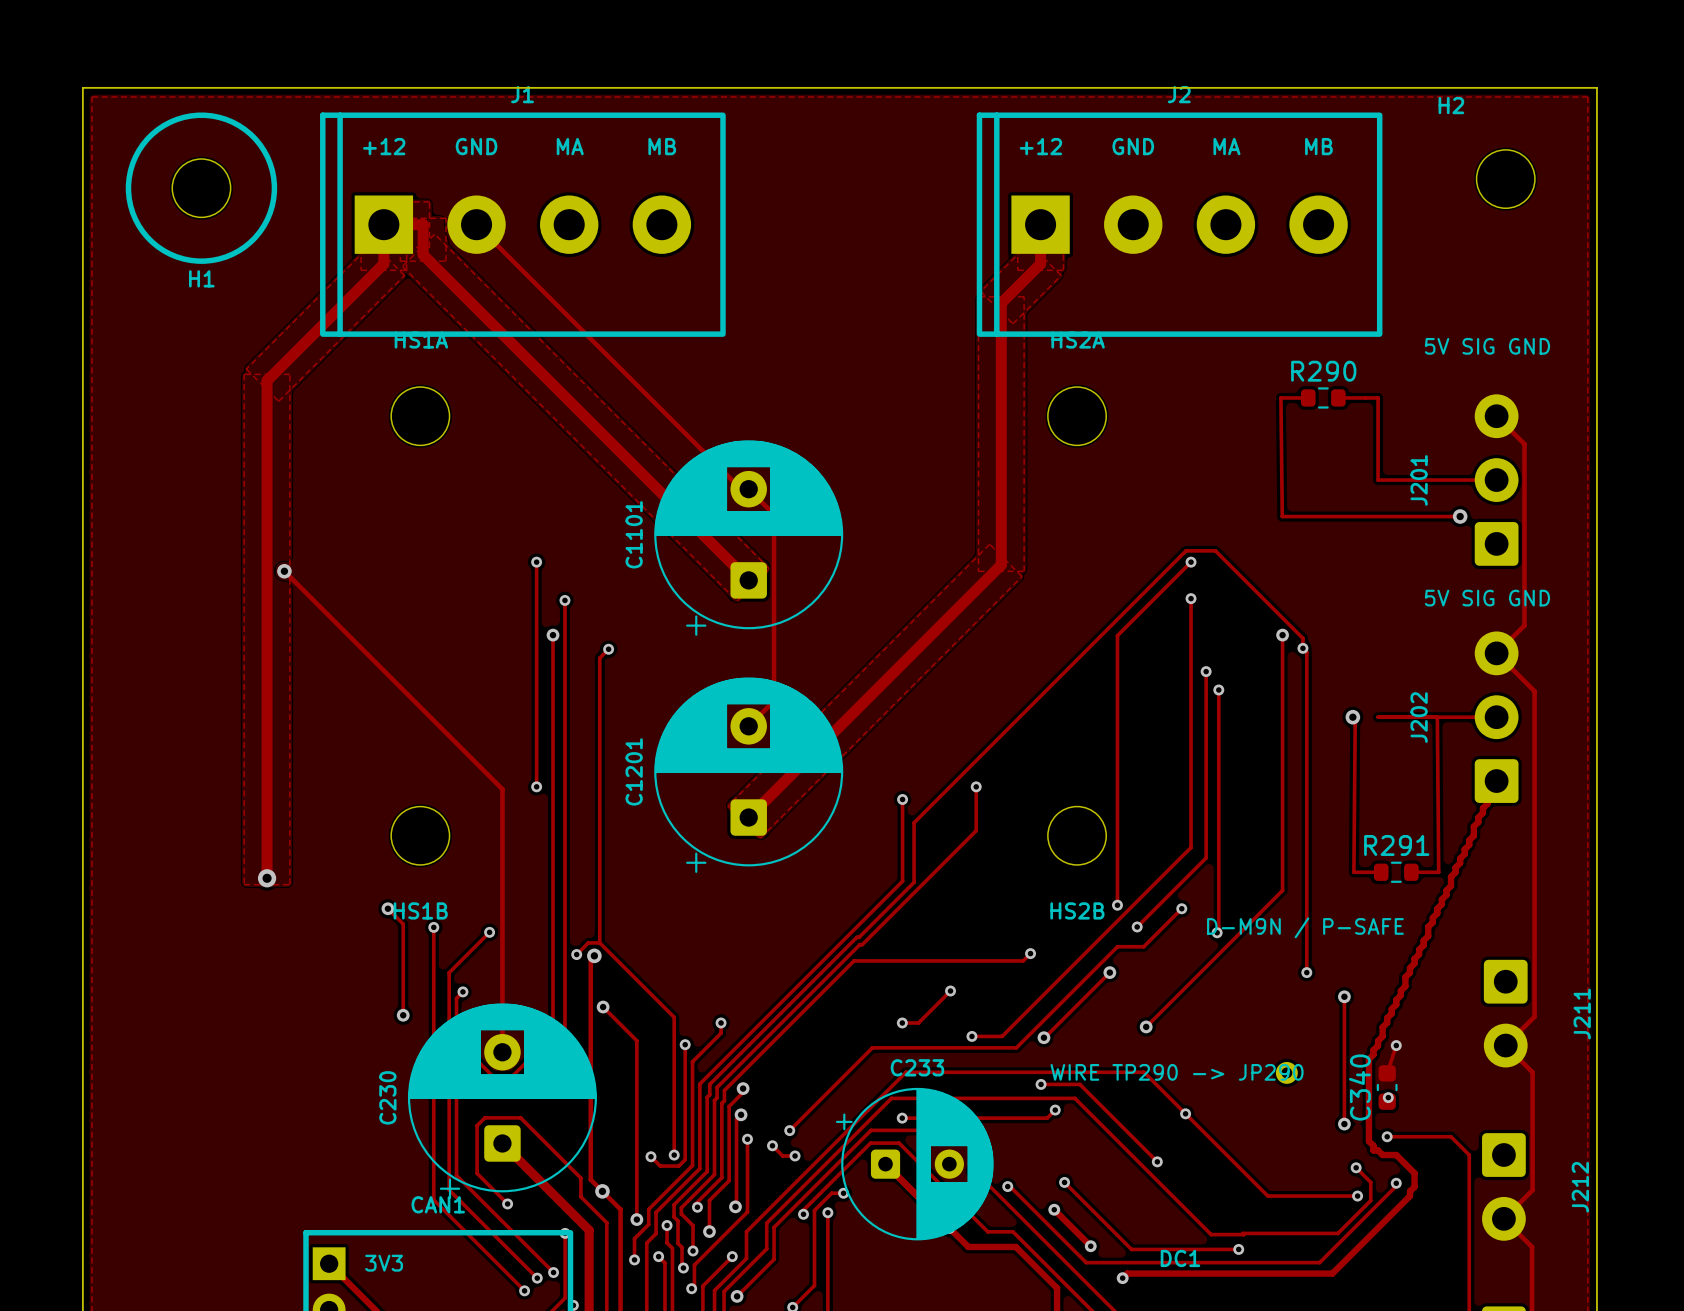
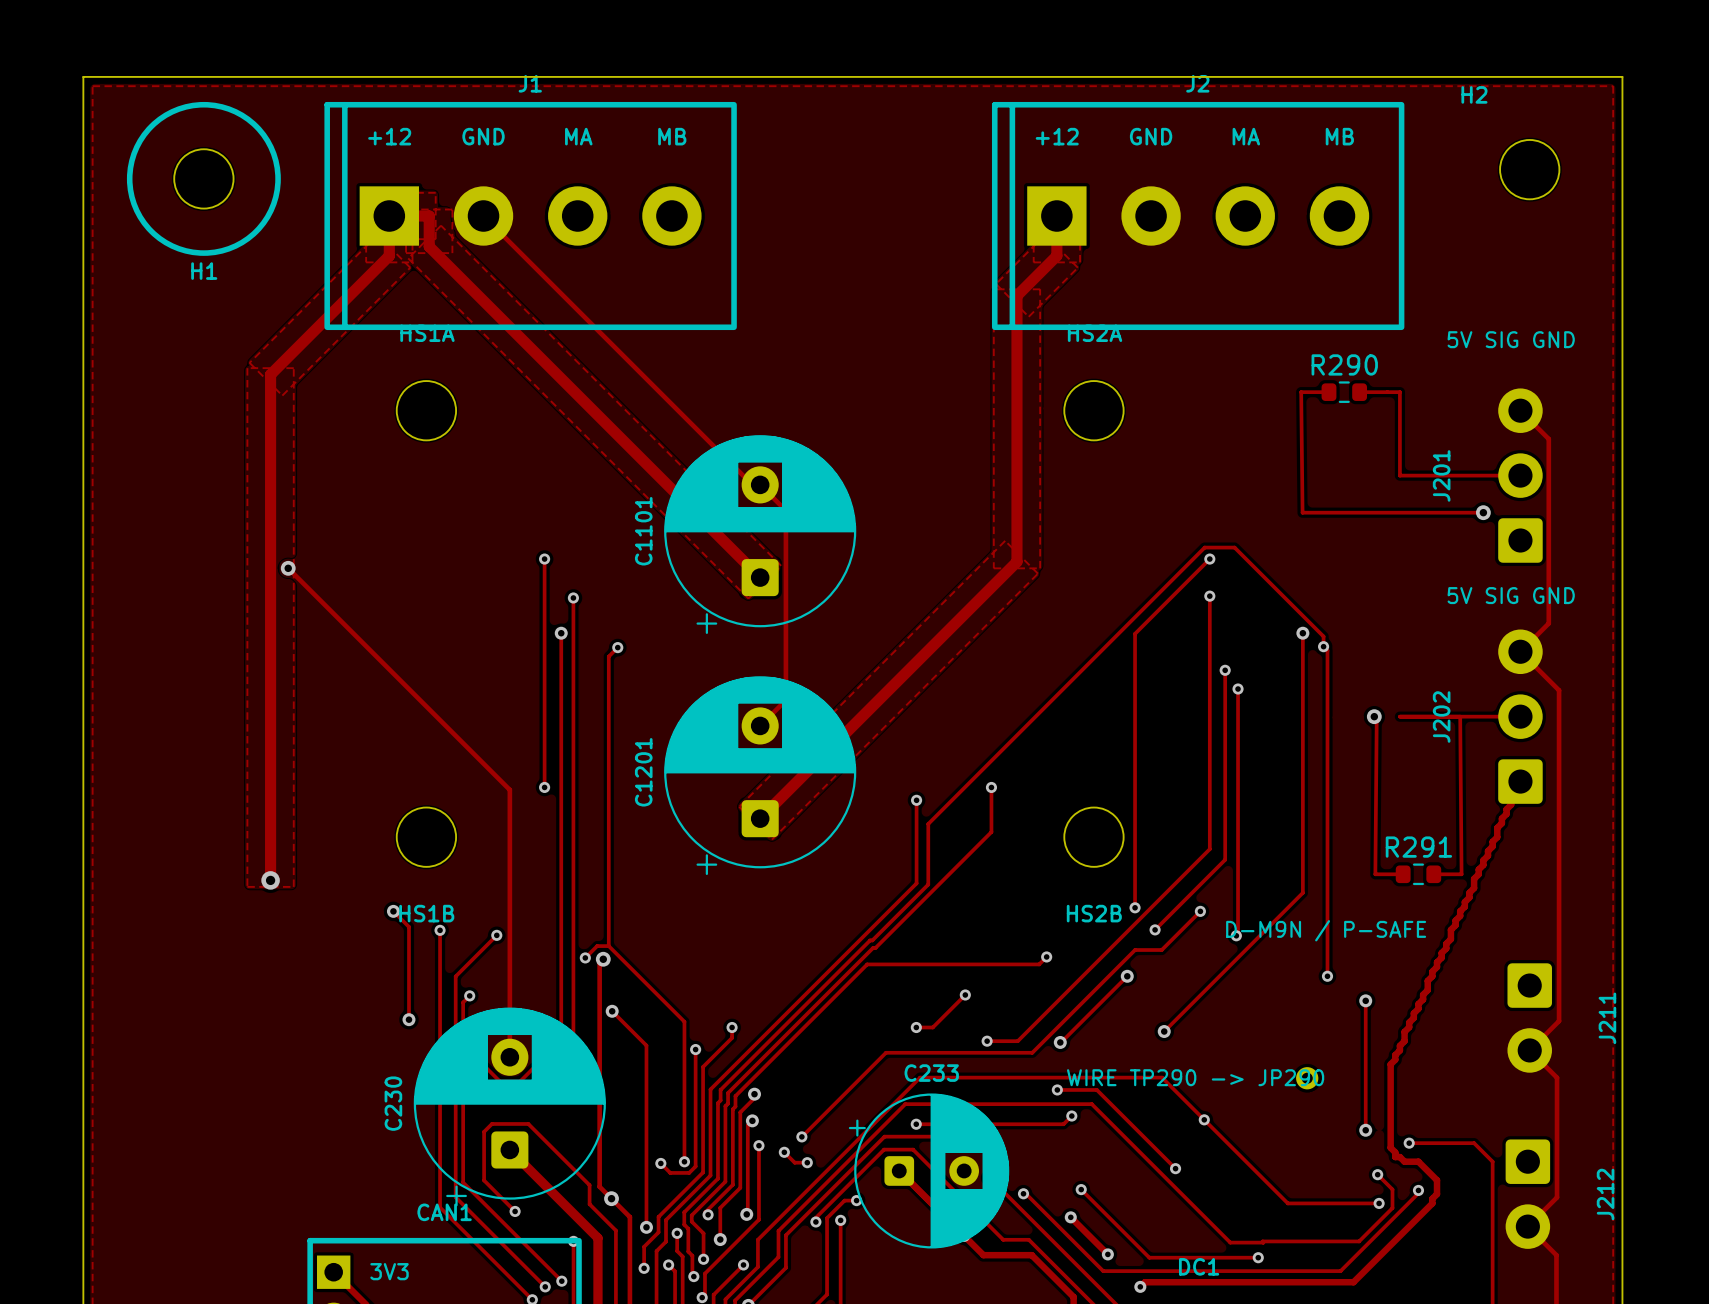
track: (1396, 1045) (1387, 1073) -> none
via: (1396, 1045) -> none
C340: (1387, 1087) -> none
via: (1388, 1097) -> none

